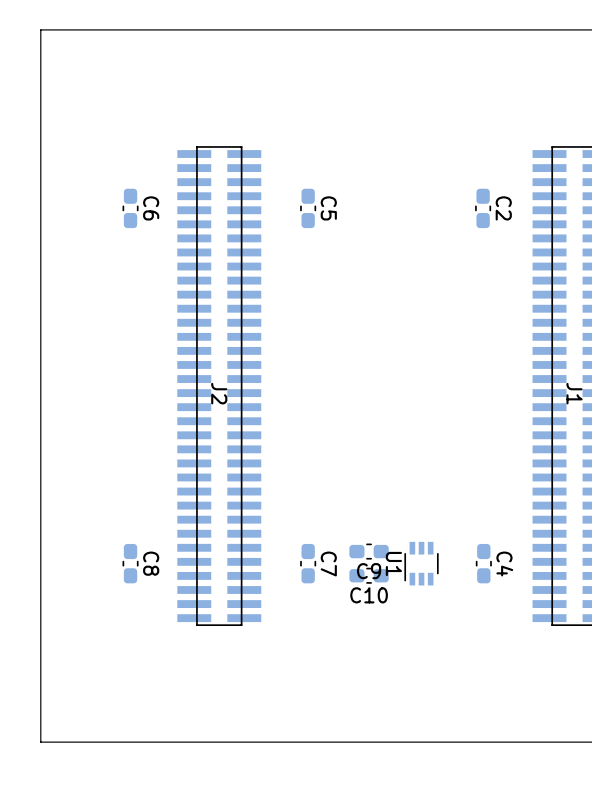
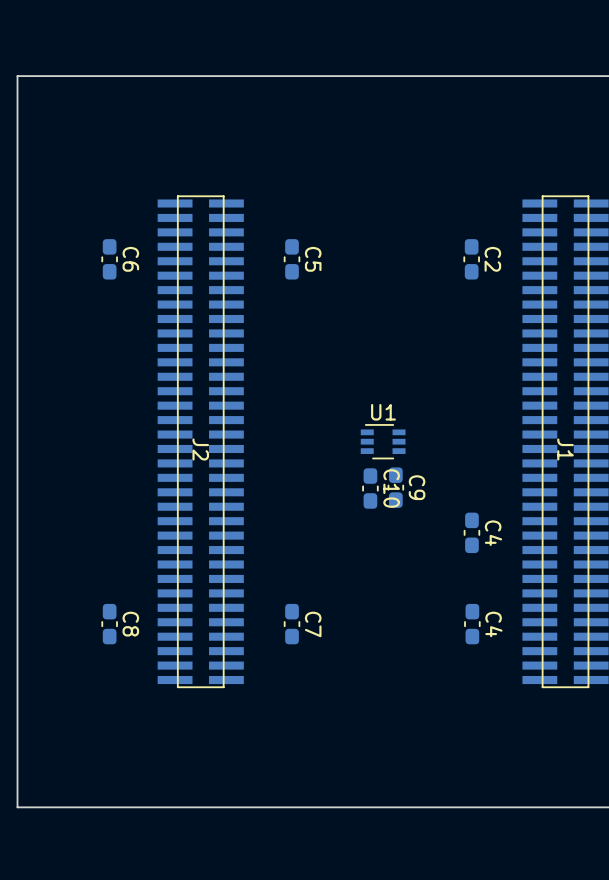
C4: none -> (471, 532)
C9 rotation: 0° (369, 551) -> 90° clockwise (395, 487)
C9 position: (369, 551) -> (395, 487)
U1 rotation: 0° (421, 563) -> 90° clockwise (383, 441)
U1 position: (421, 563) -> (383, 441)
C9 name position: C9 (369, 571) -> C9 (417, 487)
C10 rotation: 0° (369, 575) -> 90° clockwise (370, 488)
C10 position: (369, 575) -> (370, 488)
C10 name position: C10 (369, 595) -> C10 (391, 488)

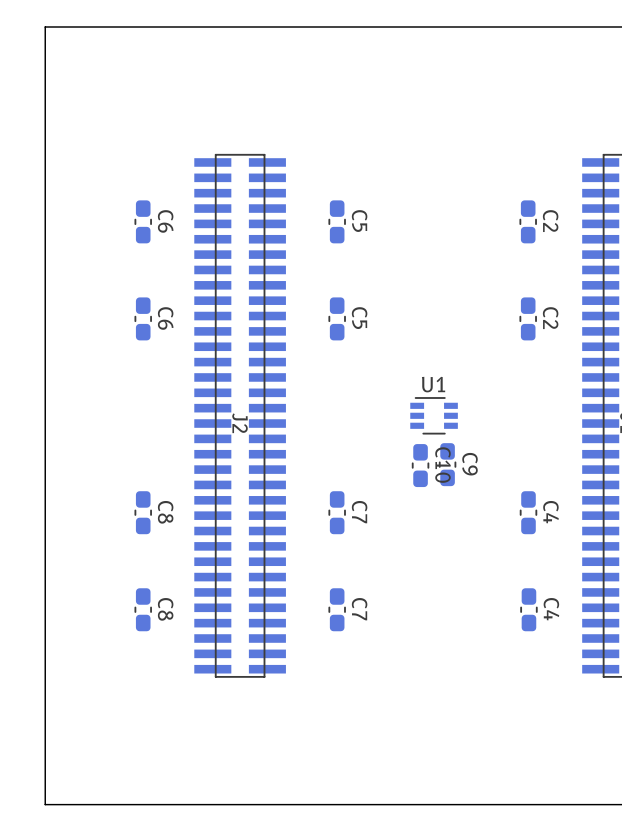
C6: none -> (143, 318)
C5: none -> (337, 318)
C2: none -> (528, 318)
C8: none -> (143, 512)
C7: none -> (337, 512)

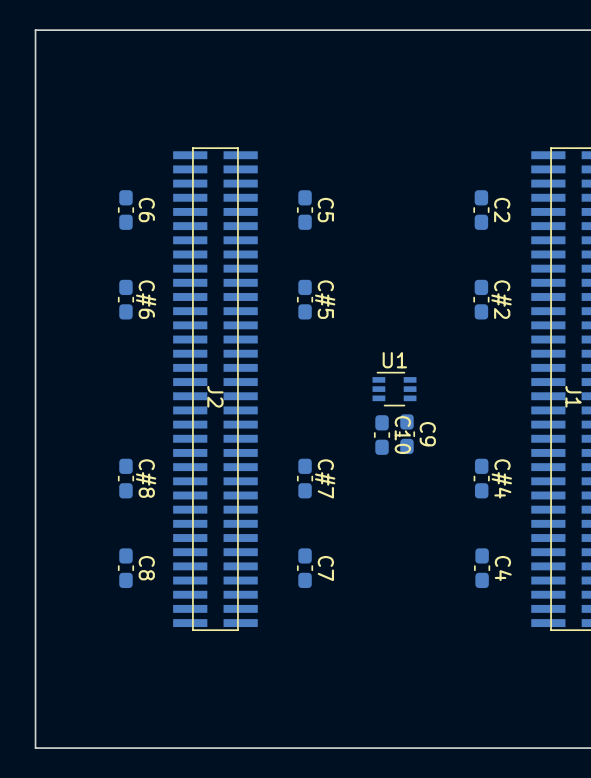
C6 name: C6 (165, 318) -> C#6 (146, 299)
C5 name: C5 (359, 318) -> C#5 (325, 299)
C2 name: C2 (550, 318) -> C#2 (501, 299)
C8 name: C8 (165, 512) -> C#8 (146, 478)
C7 name: C7 (359, 512) -> C#7 (325, 478)
C4 name: C4 (550, 512) -> C#4 (501, 478)

